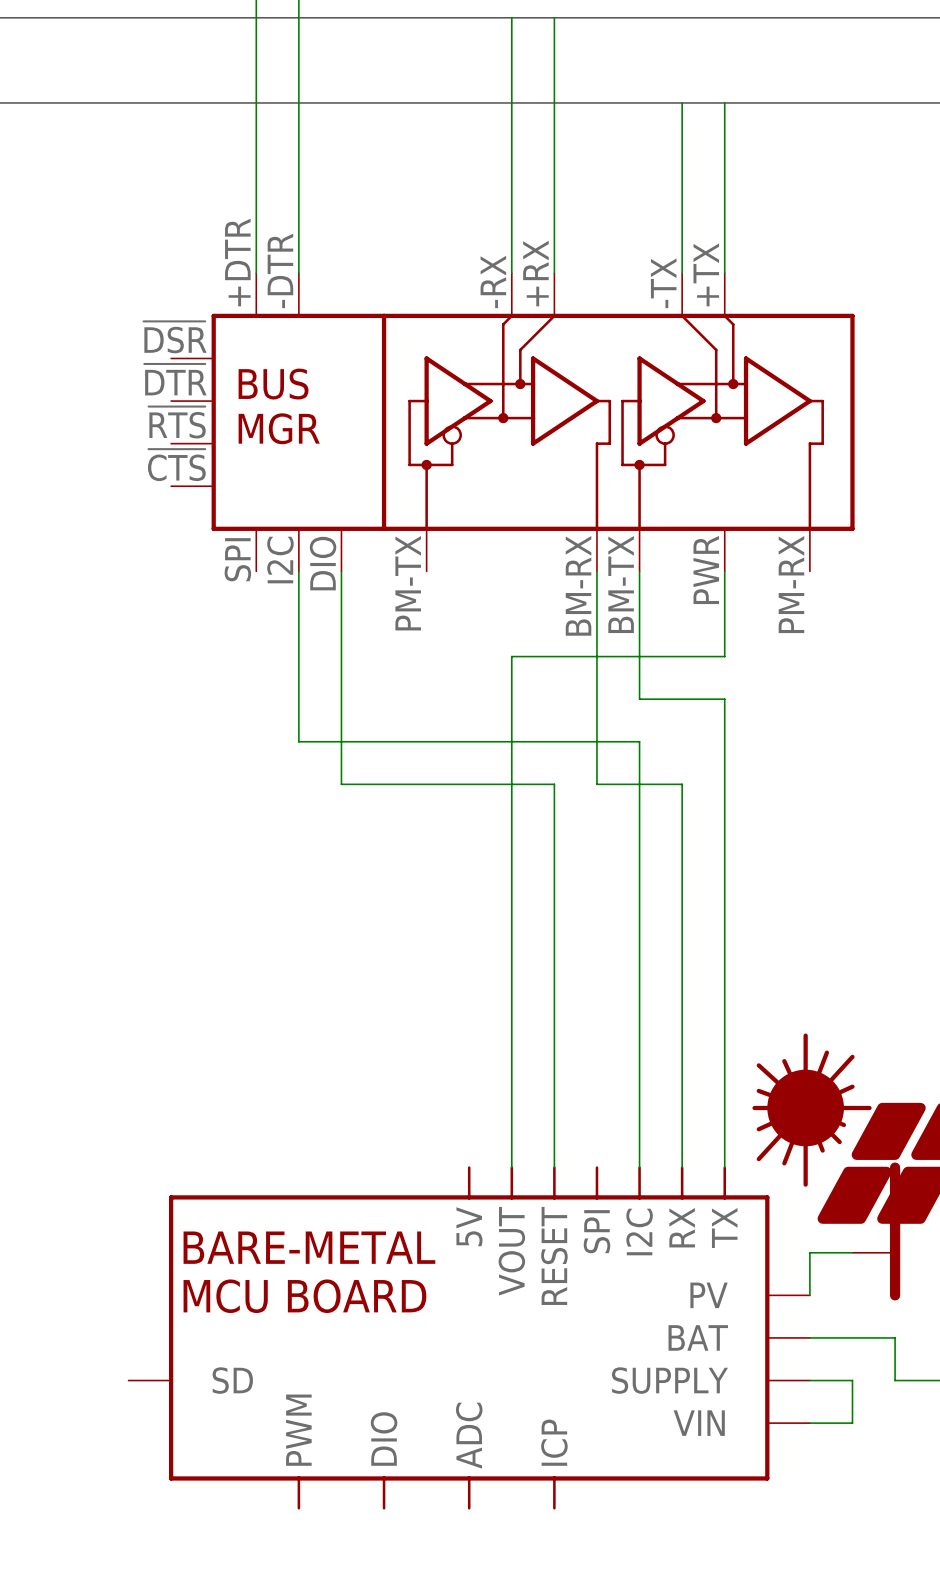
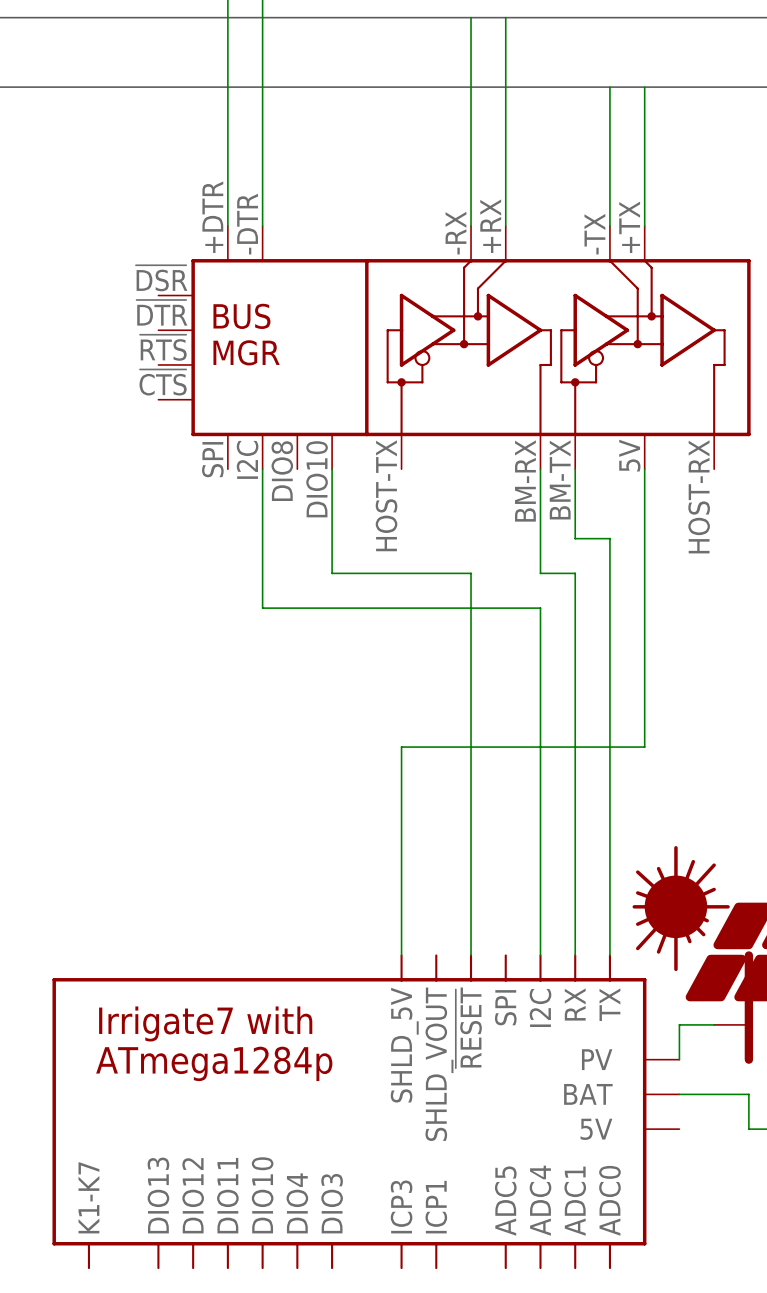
wire: (511, 17) (511, 273) -> (505, 17) (505, 226)
wire: (682, 102) (682, 273) -> (644, 87) (644, 226)
part: (512, 422) -> none
part: none -> (454, 347)
wire: (341, 571) (341, 784) (554, 784) -> (332, 469) (332, 573) (471, 573) (471, 642)
wire: (596, 571) (596, 784) (682, 784) -> (575, 573) (575, 642)
wire: (724, 571) (724, 656) -> none
wire: none -> (644, 469) (644, 747) (401, 747) (401, 955)
wire: (682, 656) (511, 656) (511, 1167) -> (575, 538) (575, 469)
wire: (682, 699) (724, 699) -> (609, 538) (609, 573)
part: (469, 1337) -> none
part: none -> (365, 1111)
wire: (809, 1380) (852, 1380) (852, 1423) (809, 1423) -> none

